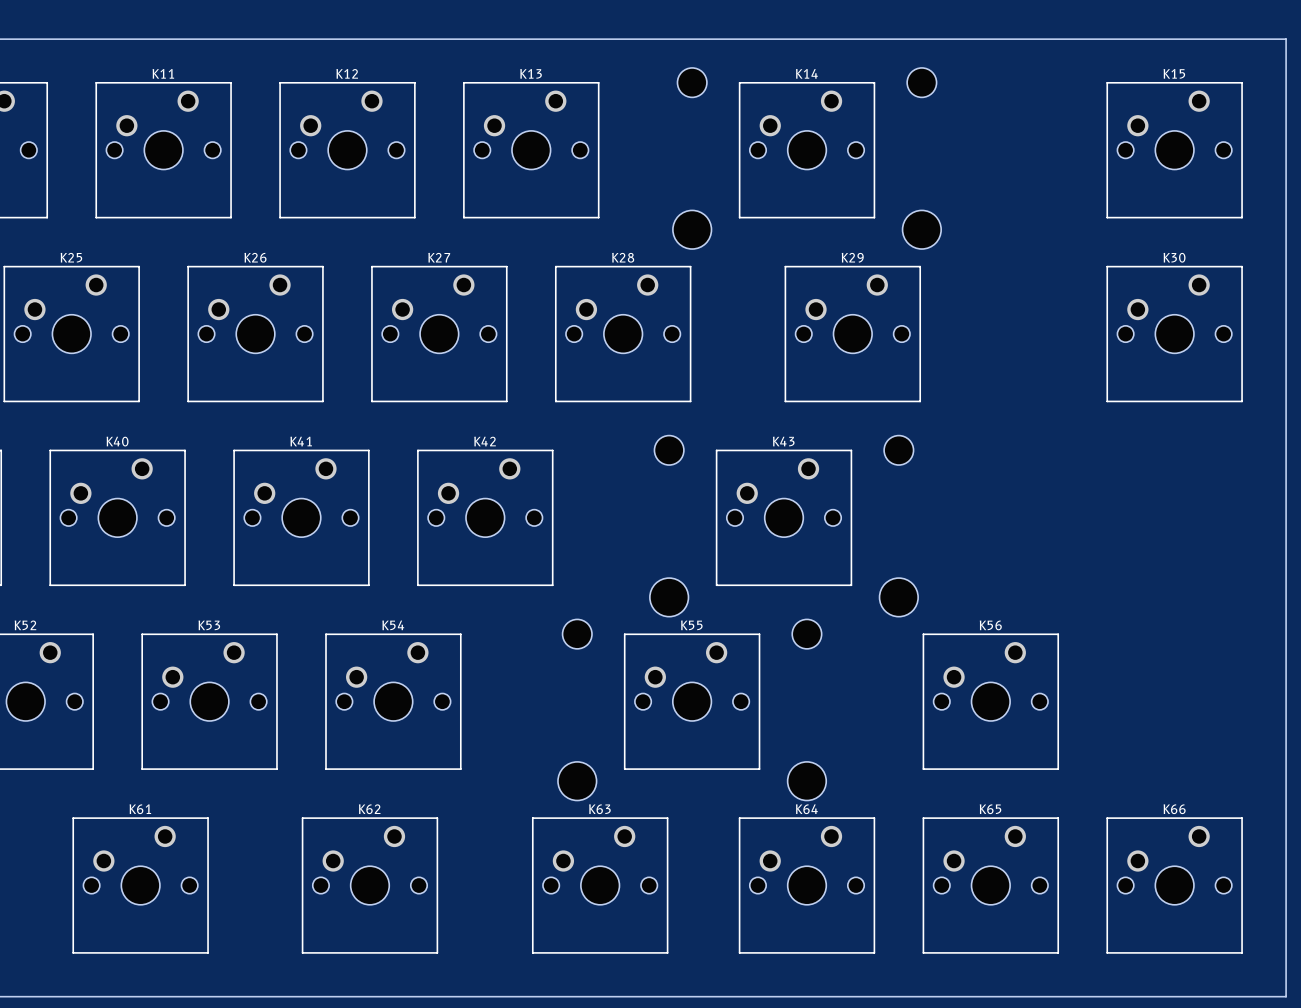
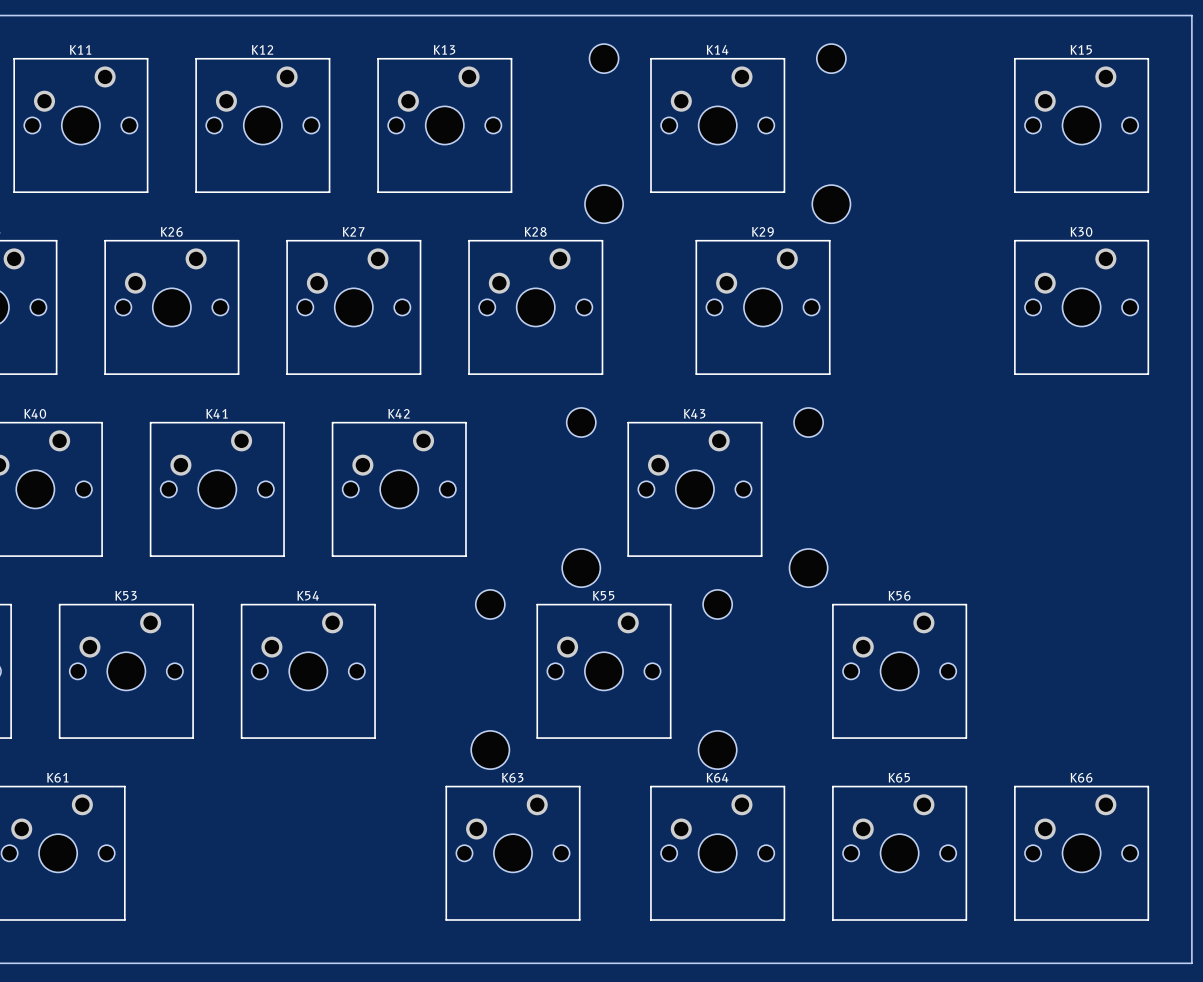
K62: (369, 885) -> none

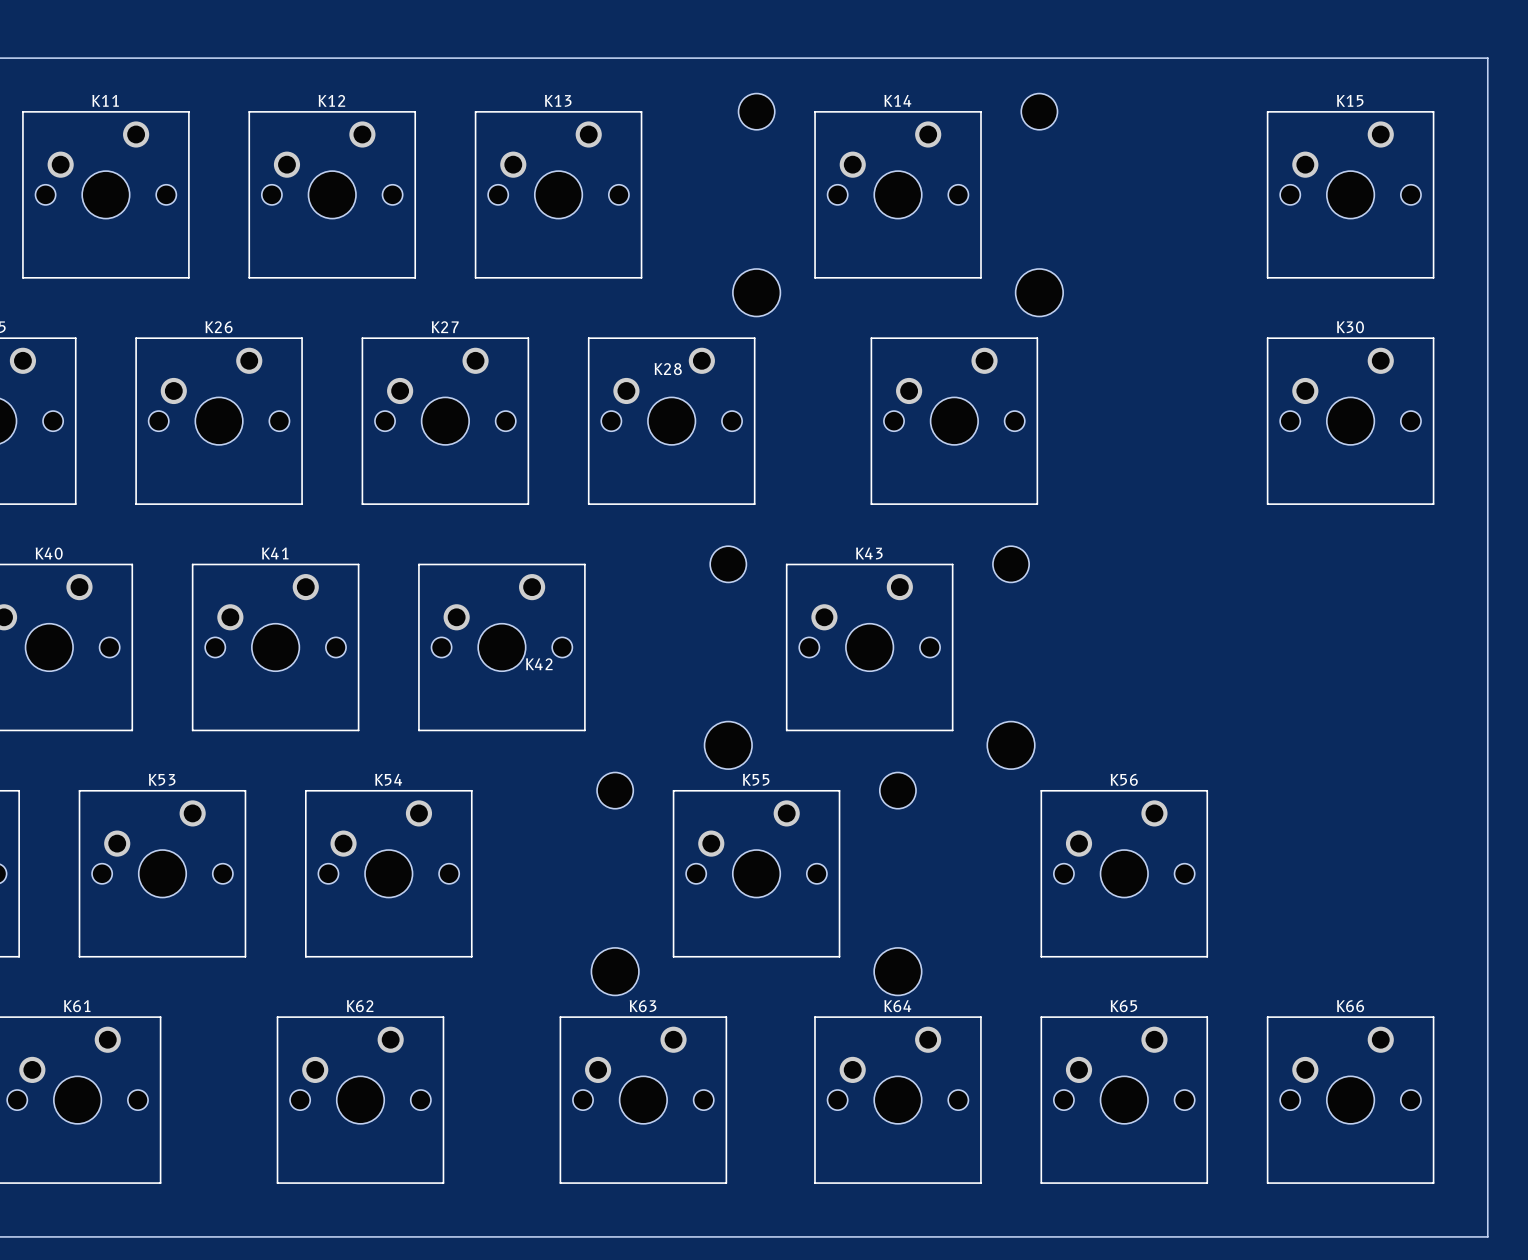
K28 name position: K28 (535, 231) -> K28 (668, 369)
K29 name: K29 (762, 231) -> none
K42 name position: K42 (399, 413) -> K42 (539, 664)
K62: none -> (360, 1100)

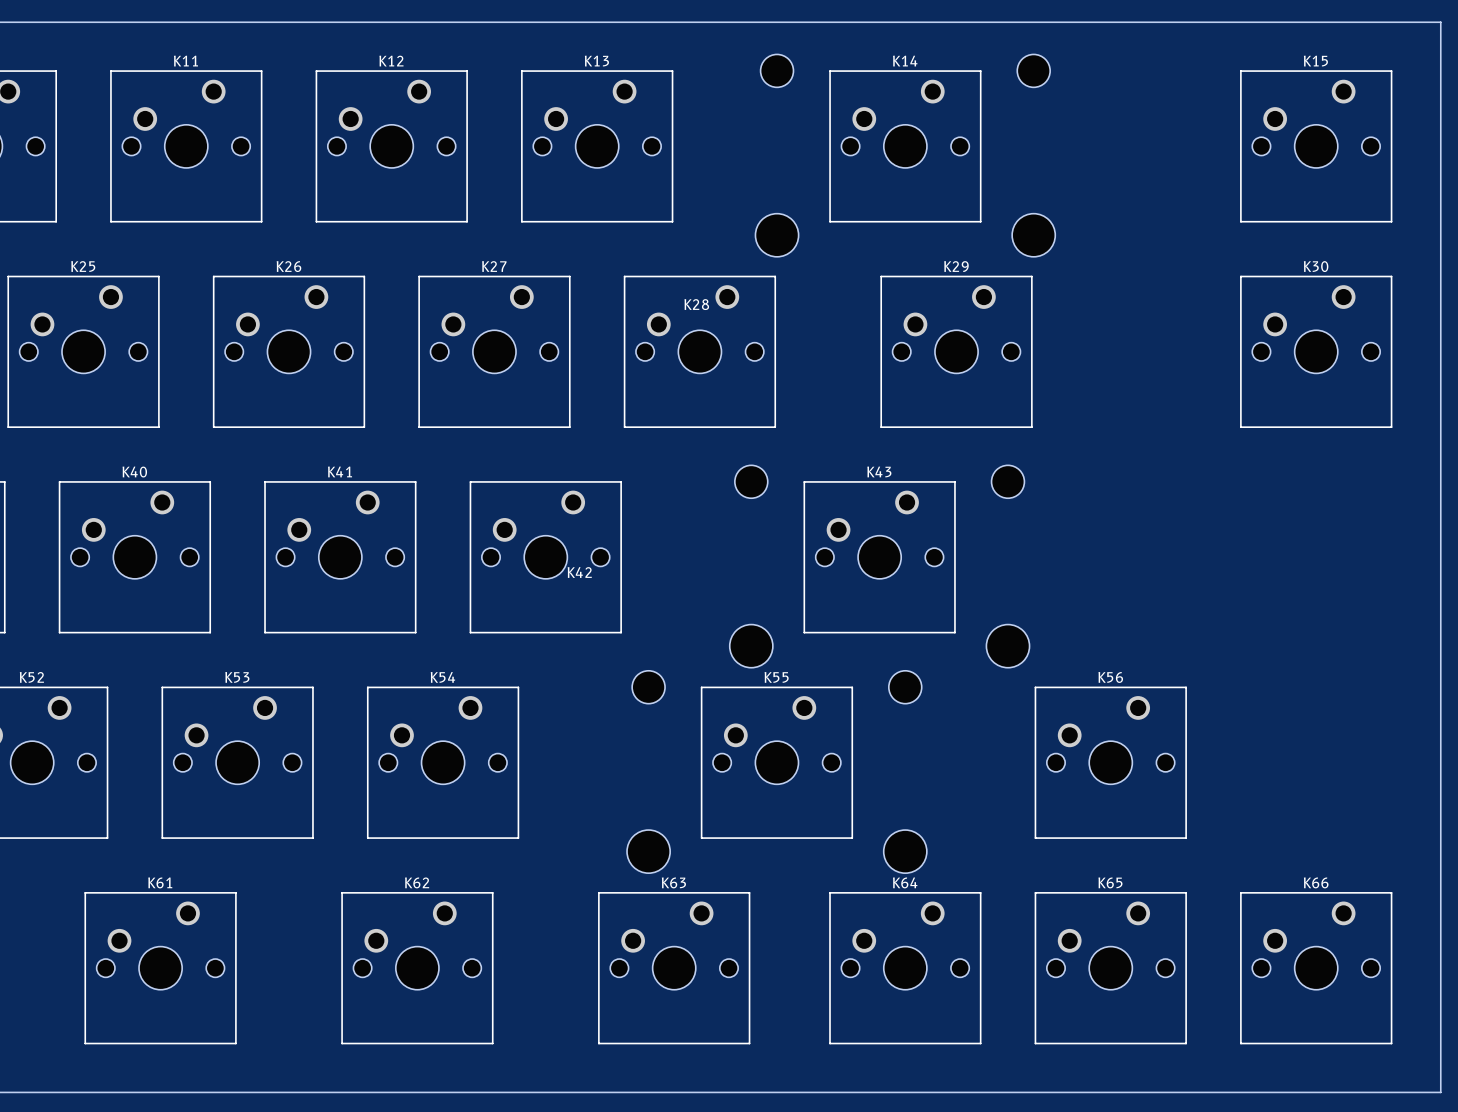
K29 name: none -> K29 (956, 266)

